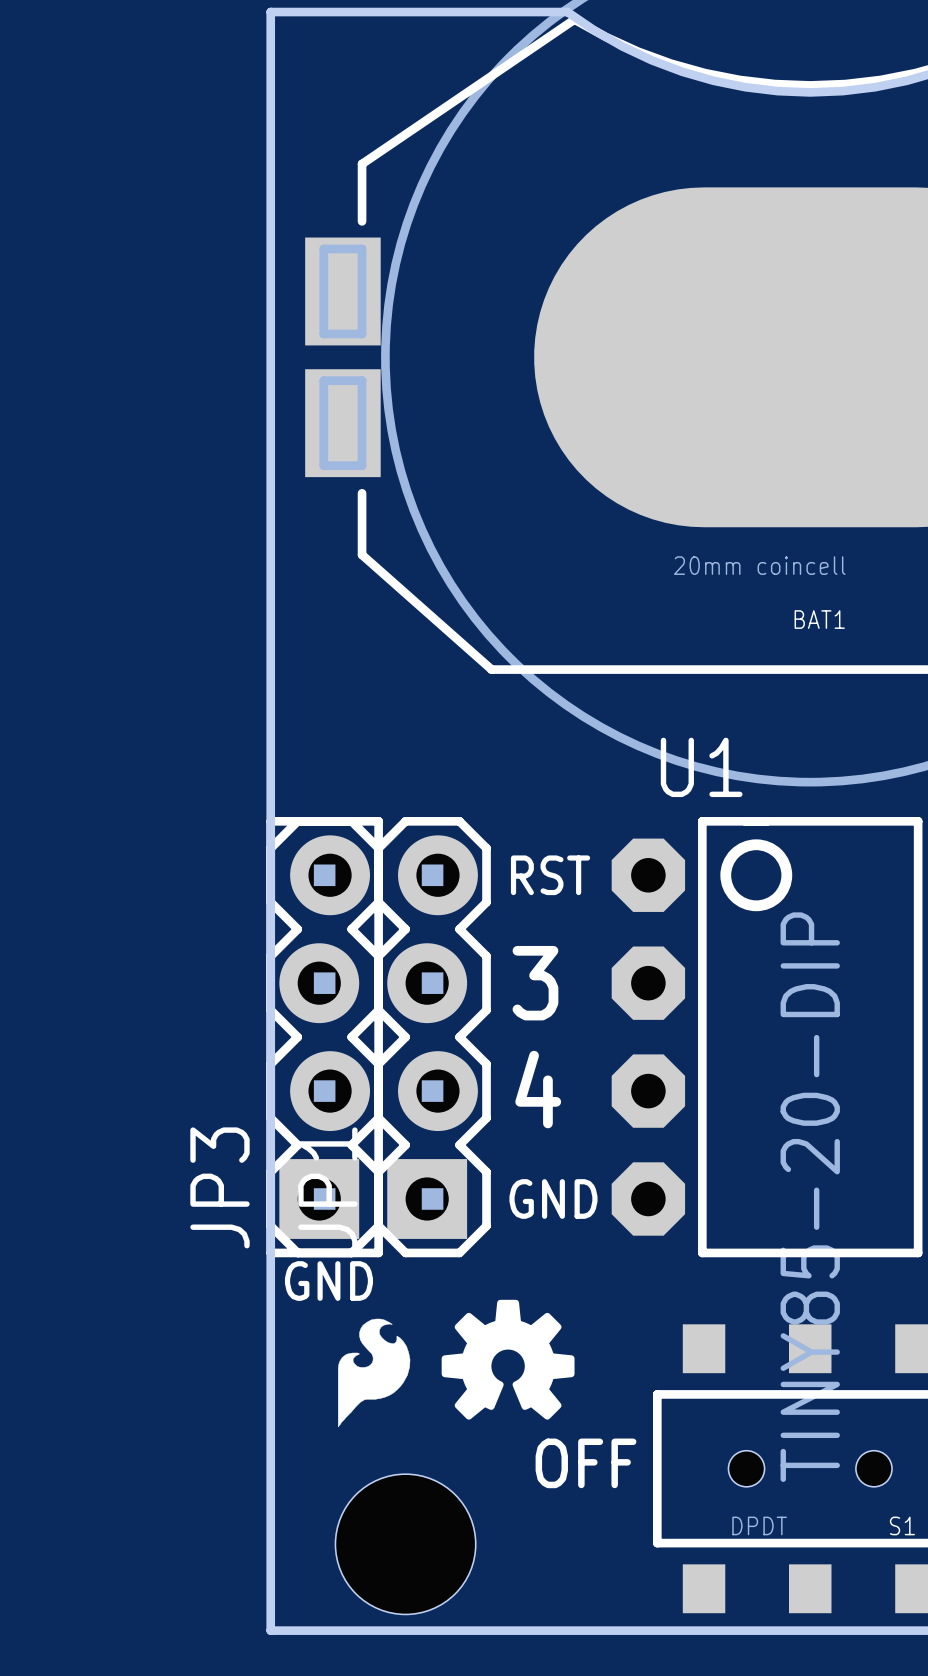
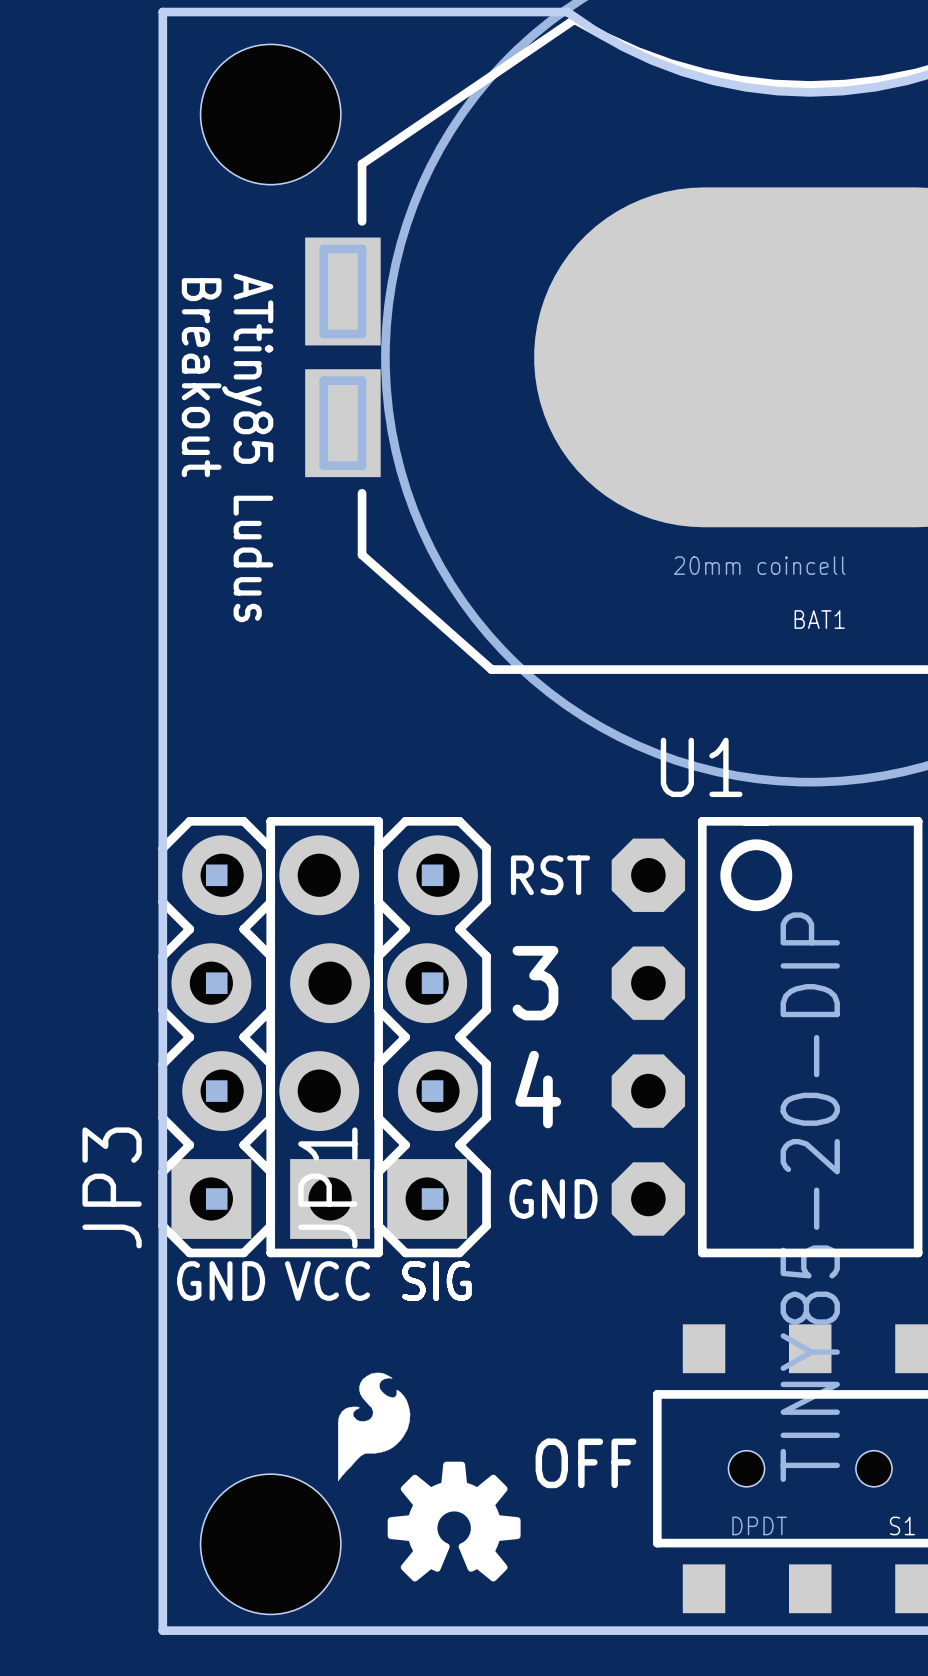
board edge: (270, 12) (270, 1630) -> (270, 12) (162, 12) (162, 1630) (270, 1630)
part: none -> (270, 114)
text: none -> Breakout (201, 377)
text: none -> ATtiny85 Ludus (247, 447)
JP3 position: (324, 1037) -> (216, 1037)
part: none -> (324, 1037)
text: none -> GND (221, 1281)
text: GND (328, 1281) -> VCC (327, 1281)
text: none -> SIG (436, 1281)
drawing position: (508, 1359) -> (454, 1521)
drawing position: (374, 1372) -> (374, 1426)
part position: (405, 1544) -> (270, 1544)

